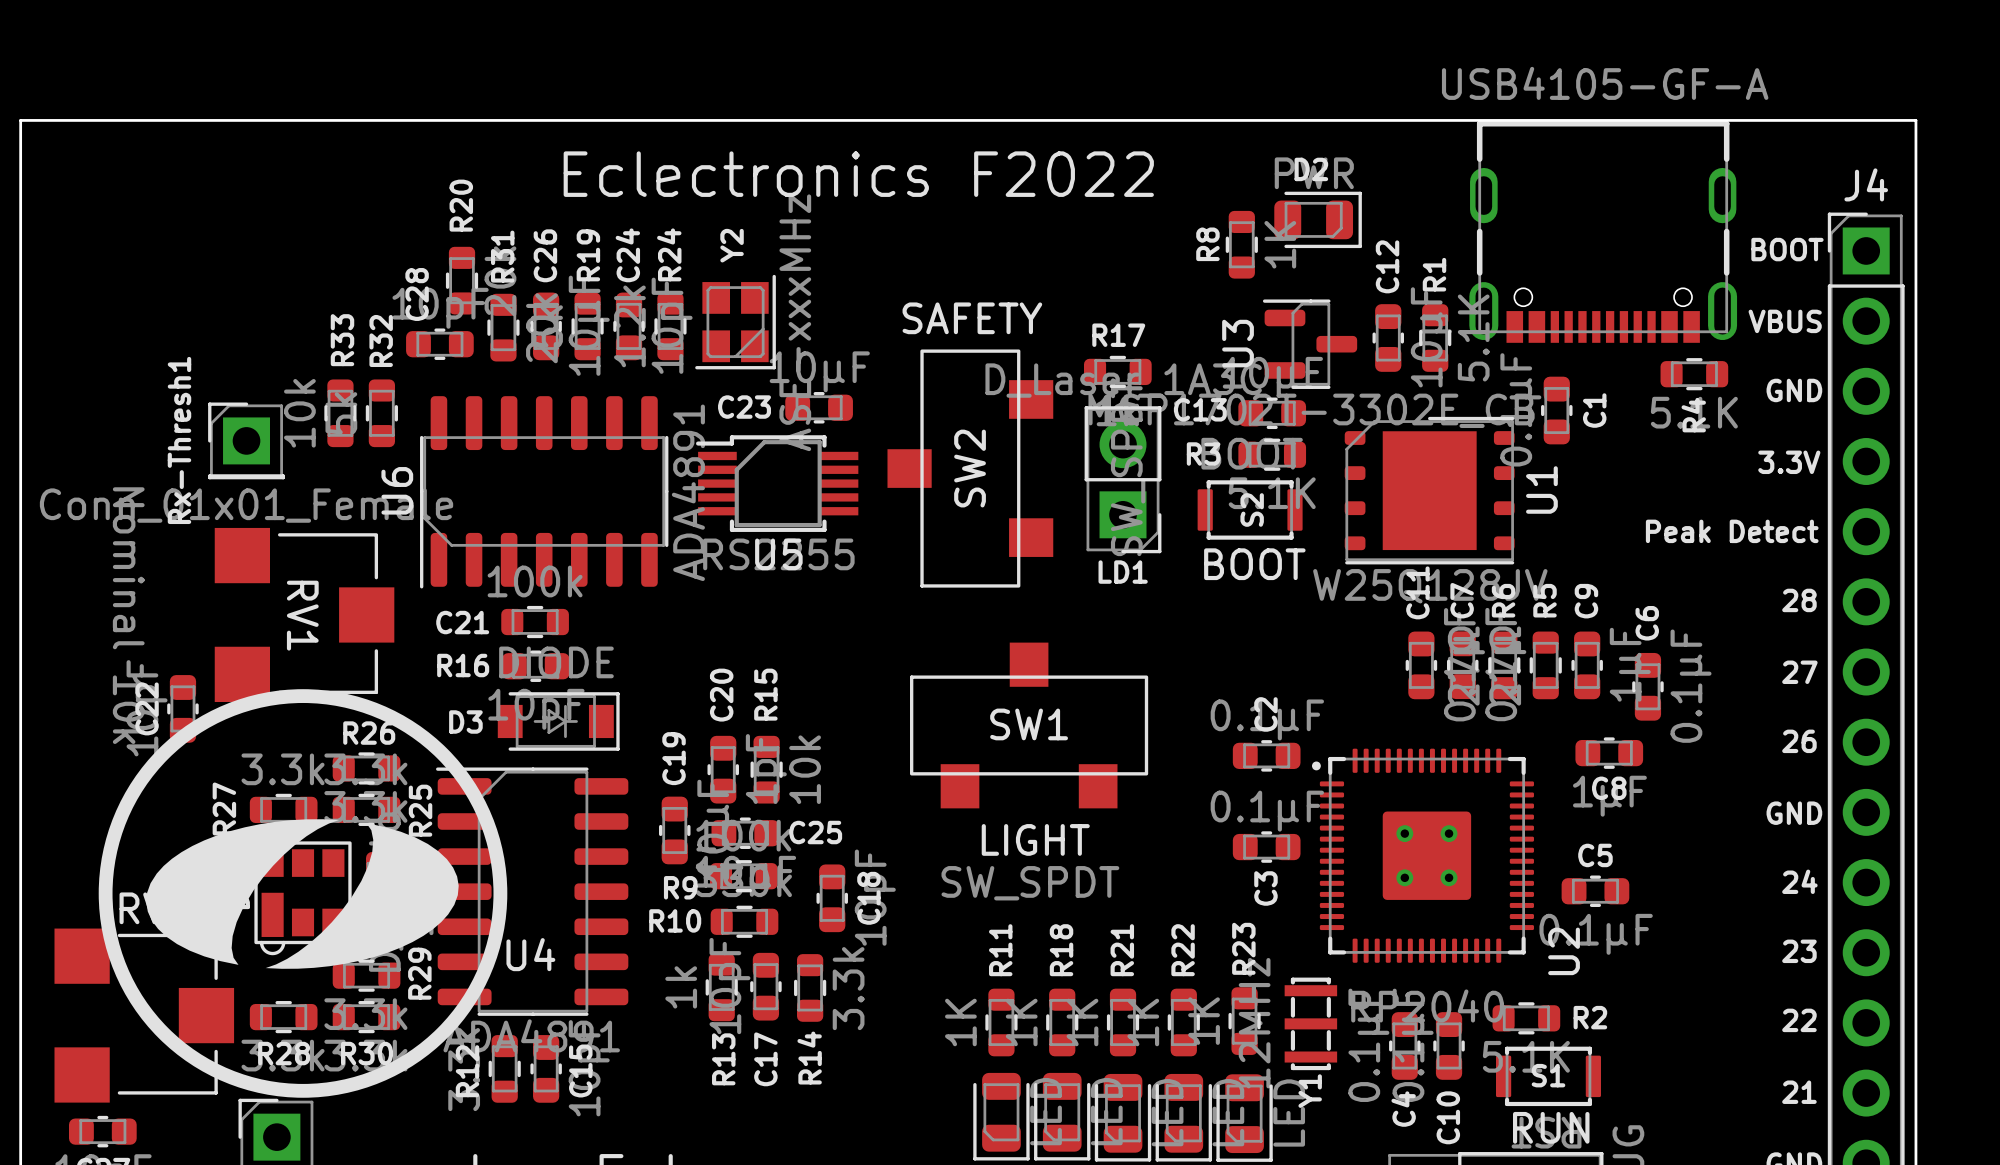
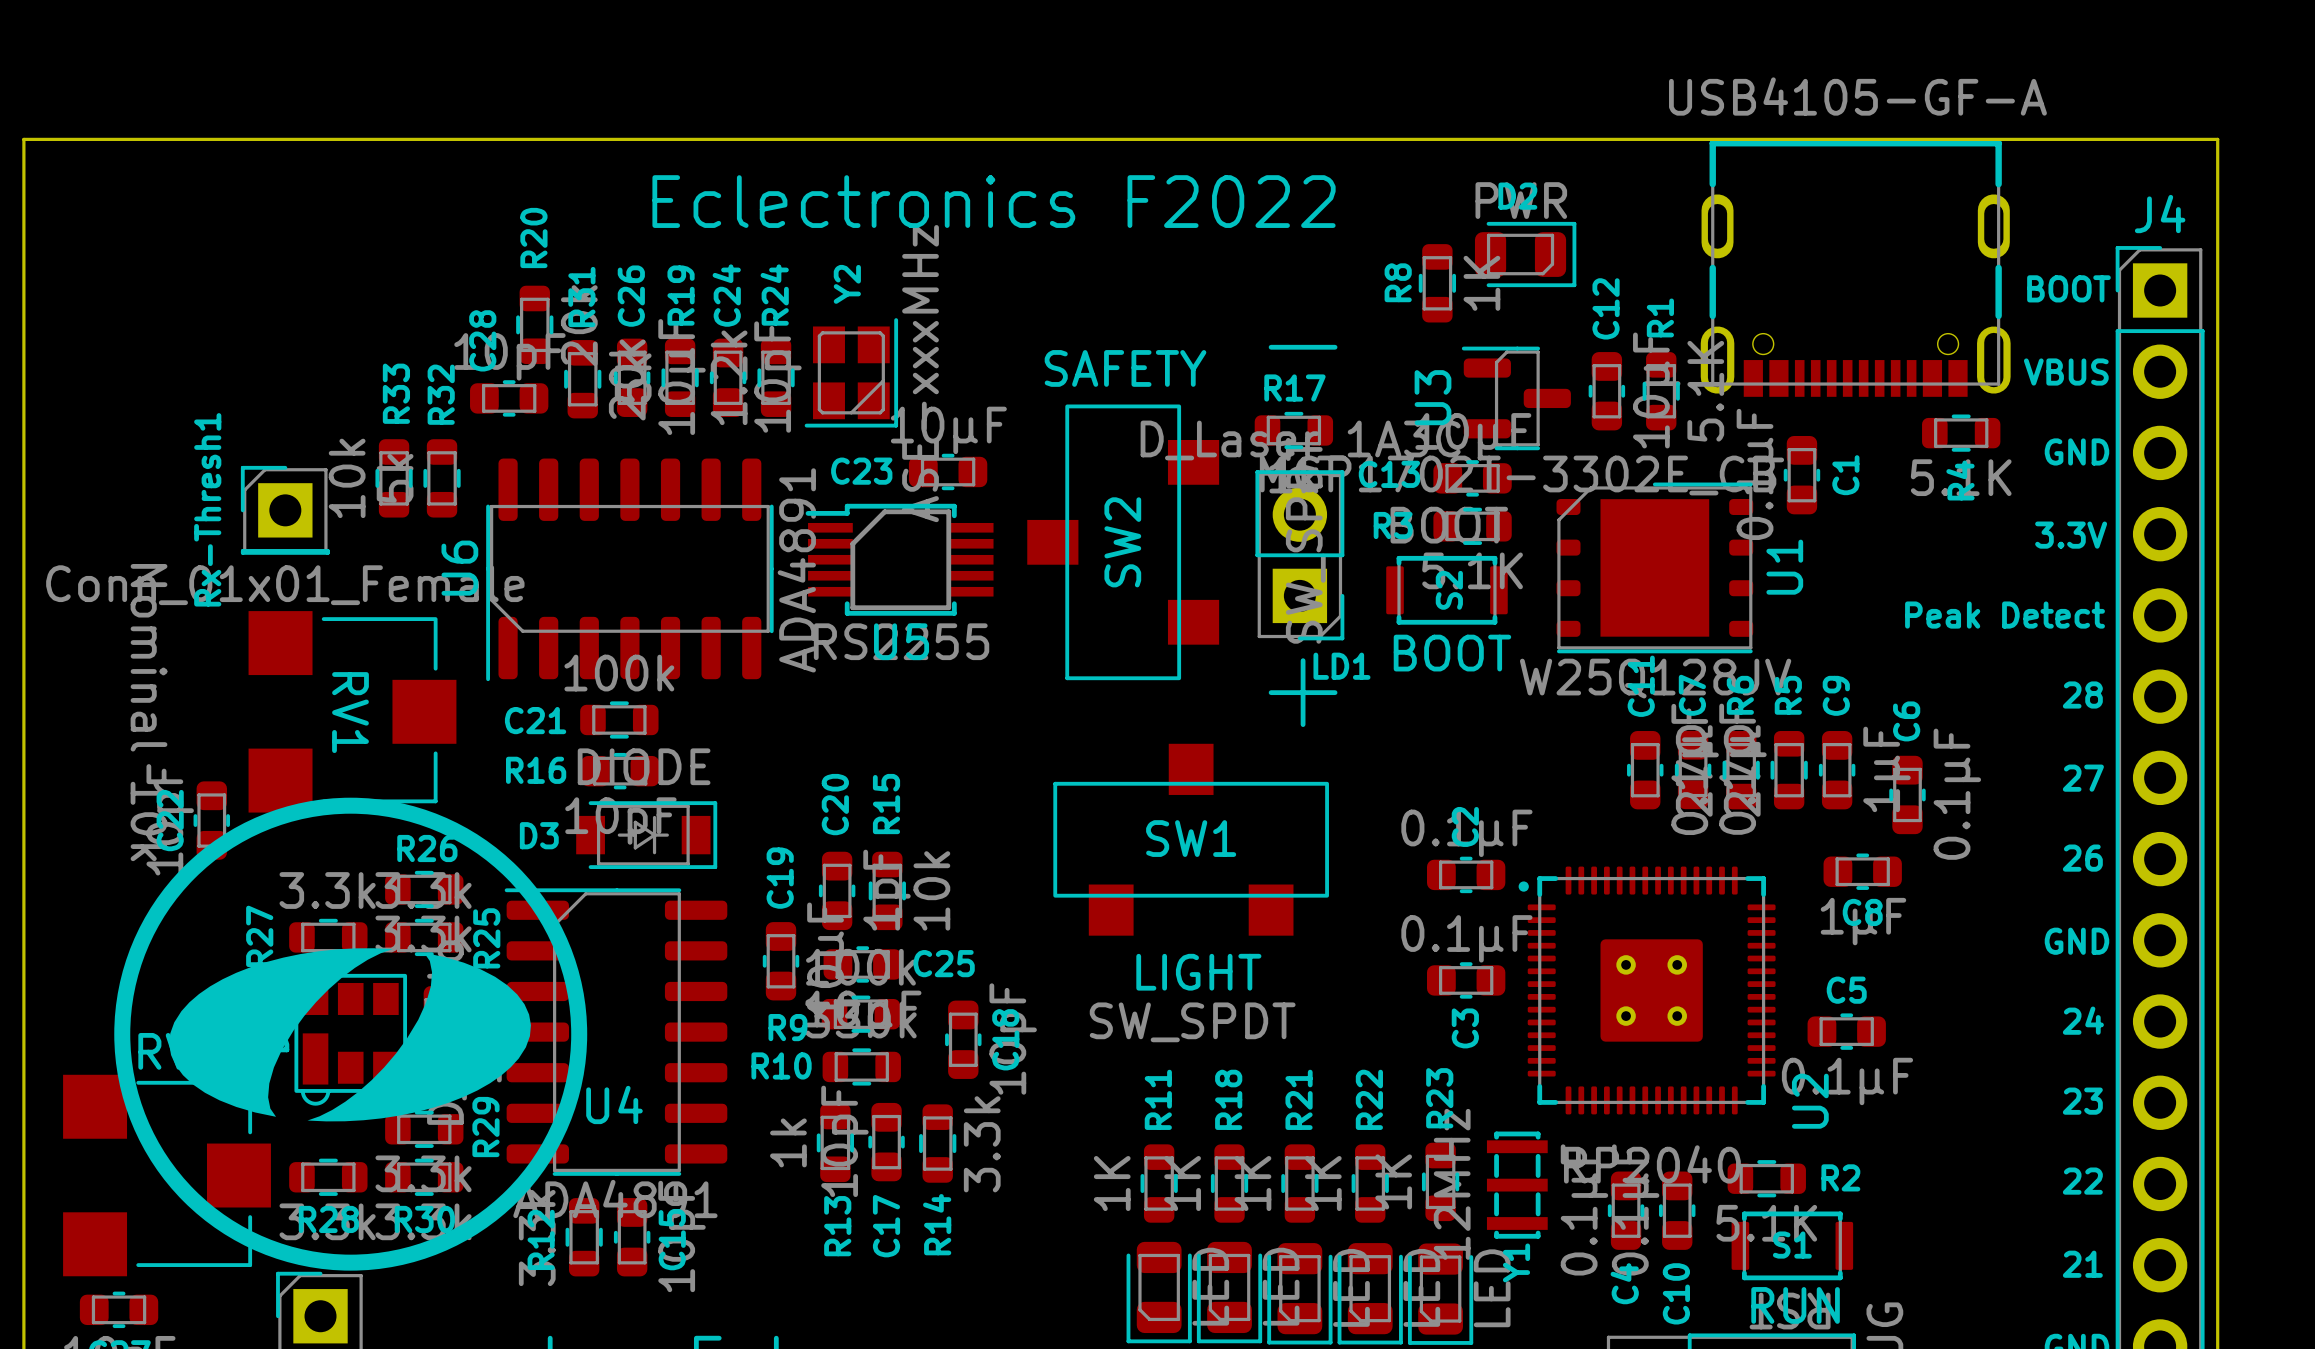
line: none -> (1271, 347) (1335, 347)
line: none -> (1303, 660) (1303, 724)
LD1 name position: LD1 (1123, 572) -> LD1 (1341, 666)
line: none -> (1271, 692) (1335, 692)

